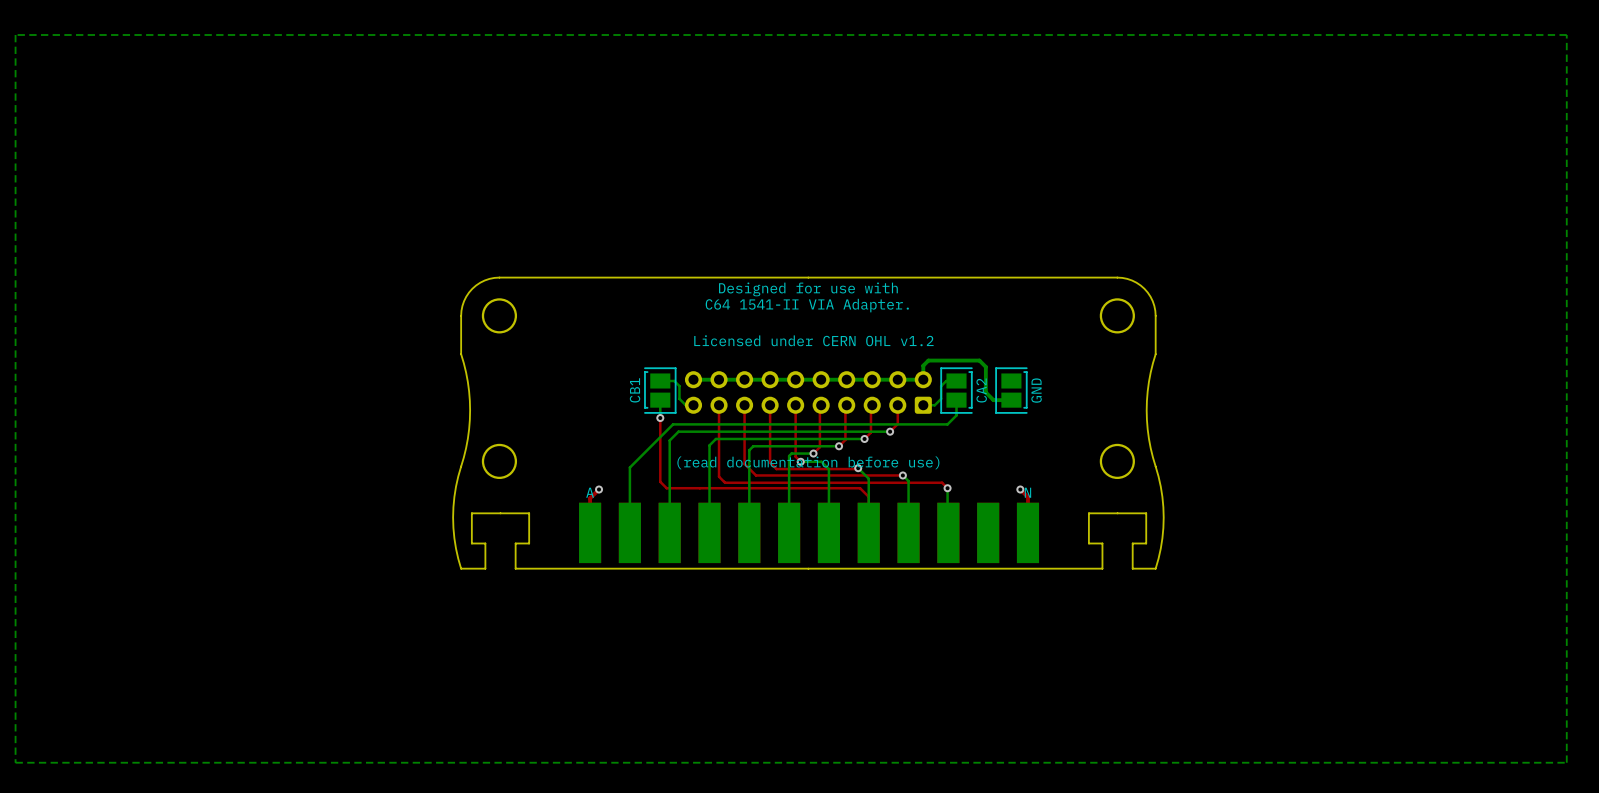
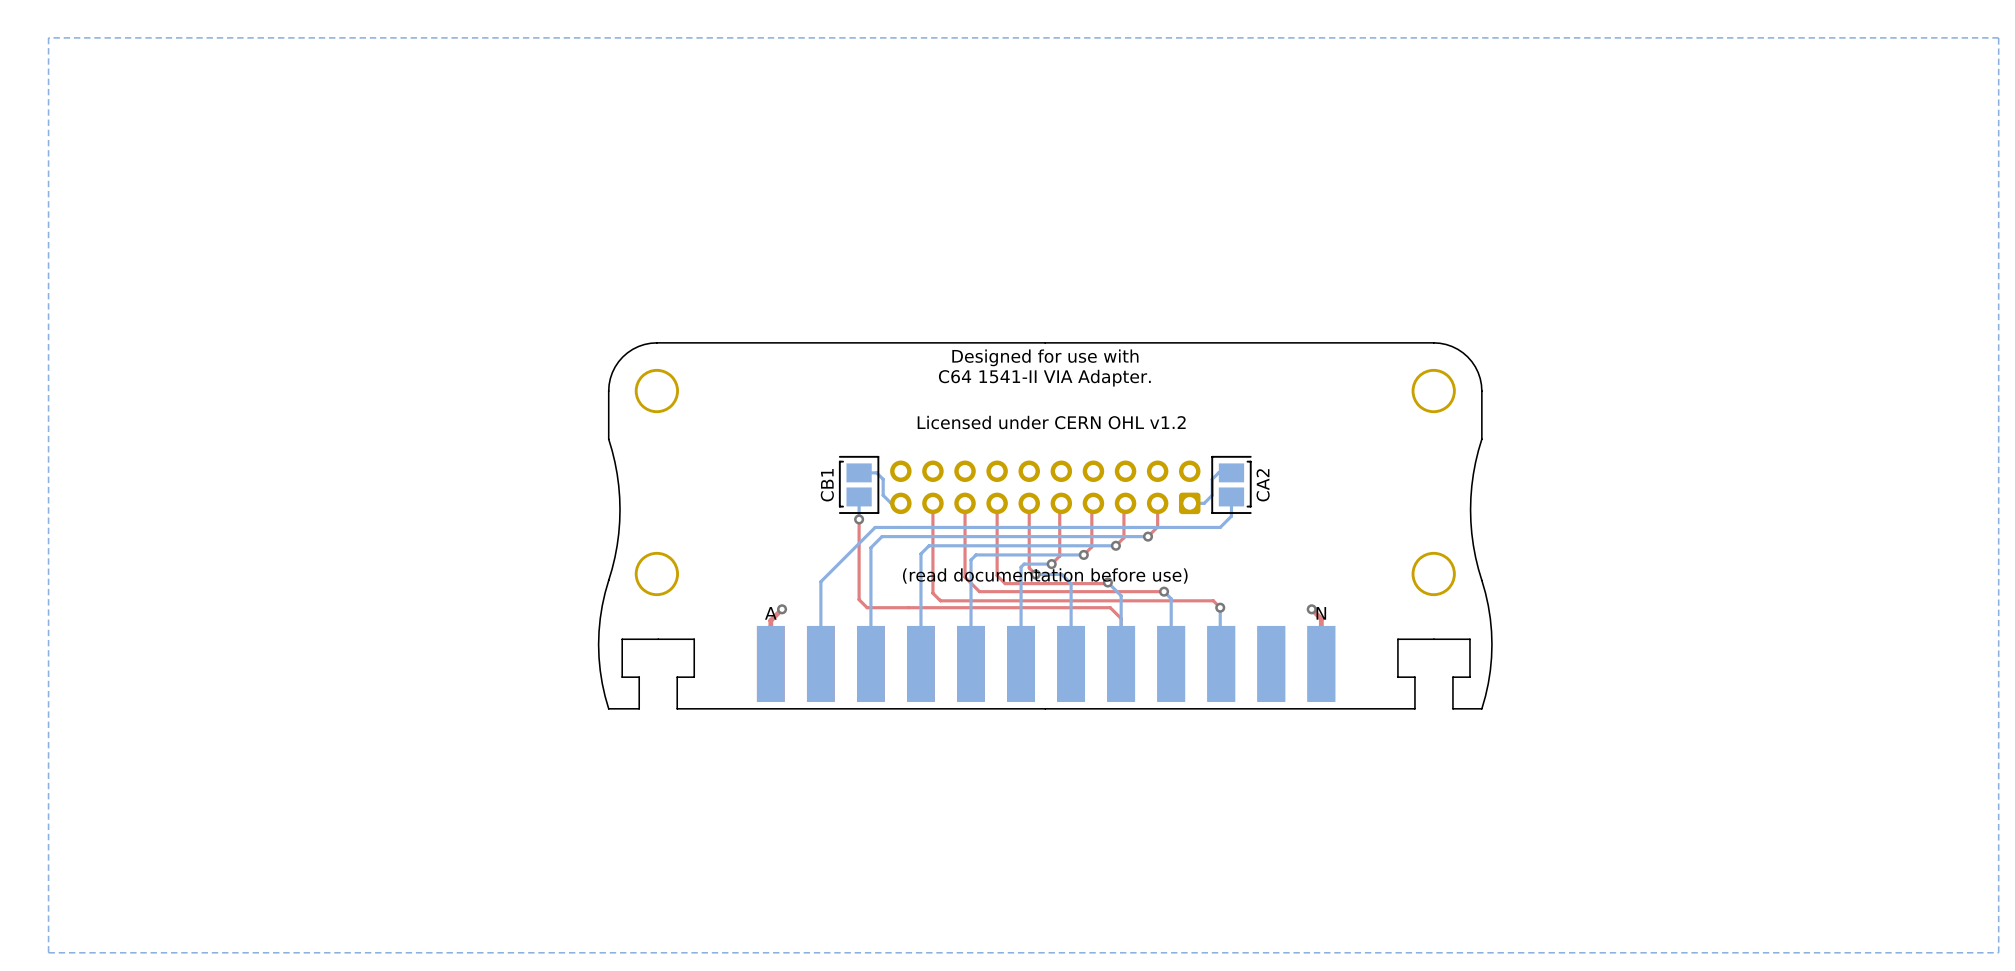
bottom track: (693, 379) (923, 379) (923, 365) (928, 360) (979, 360) (985, 366) (985, 392) (993, 400) (1011, 400) -> none
part: GND (1011, 390) -> none

